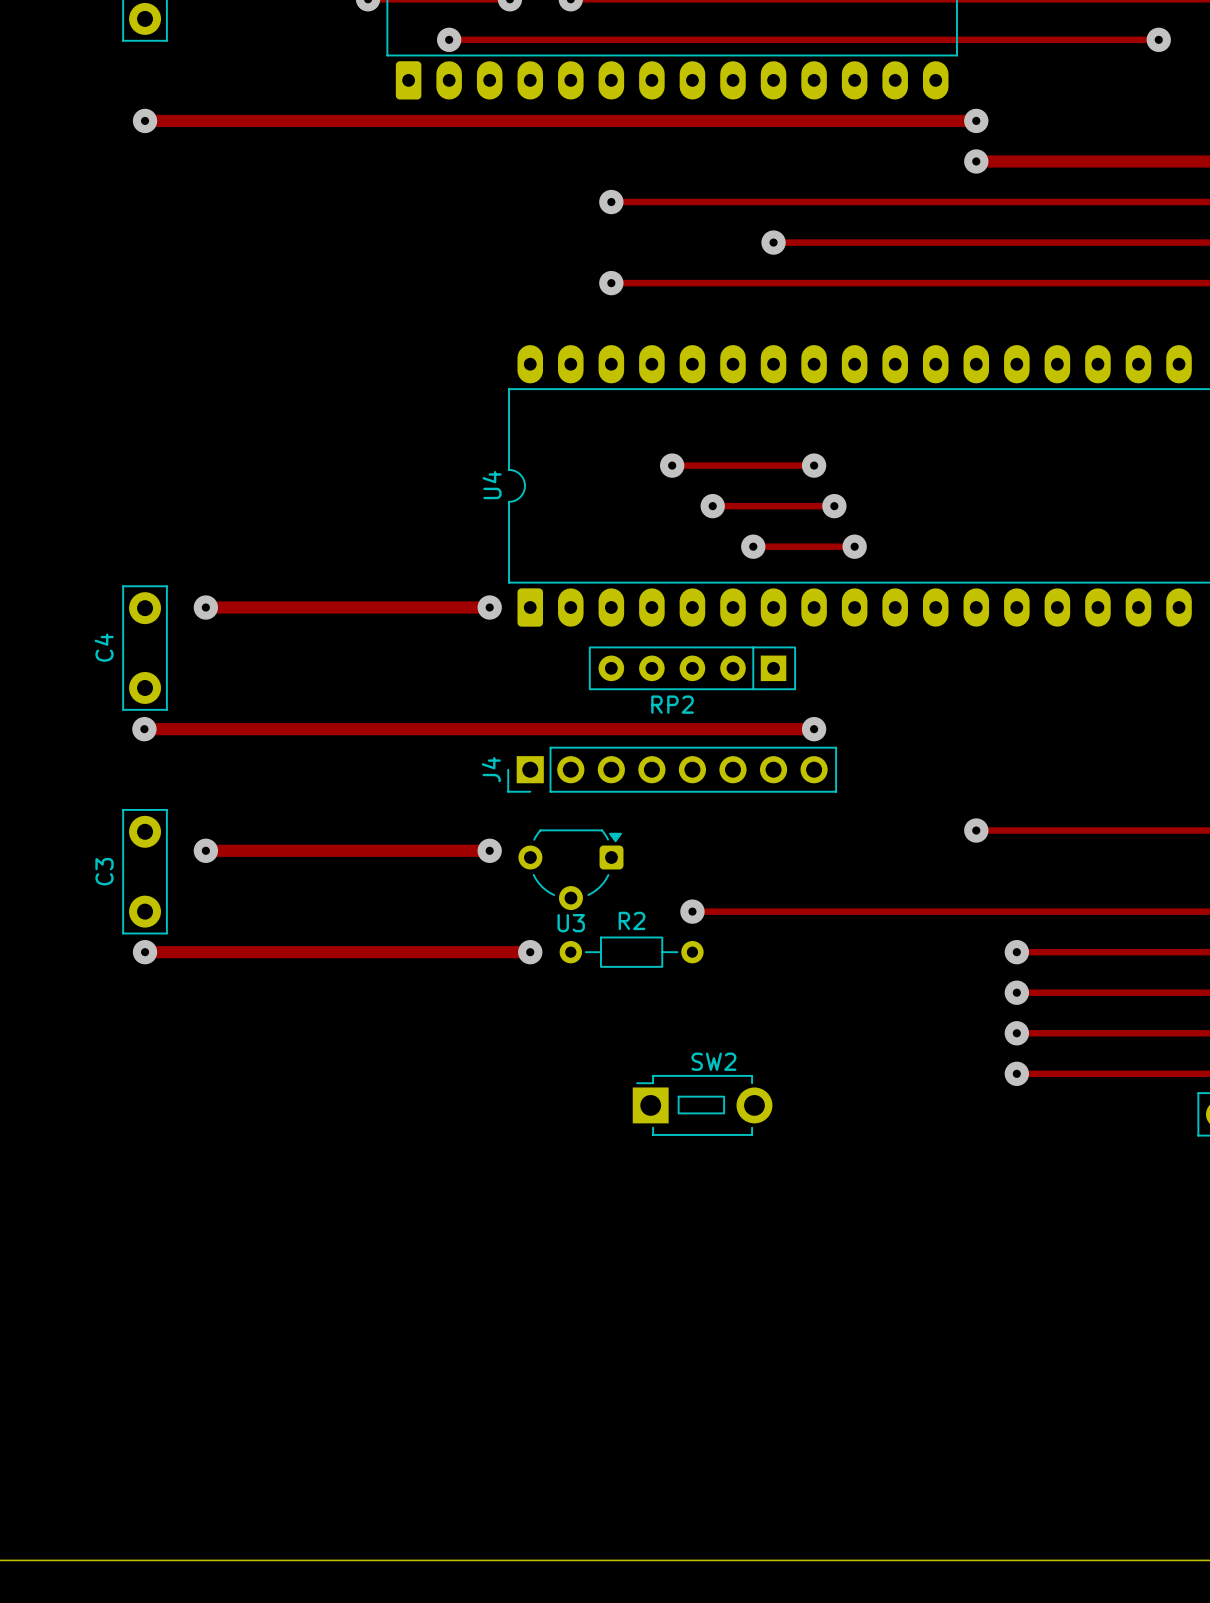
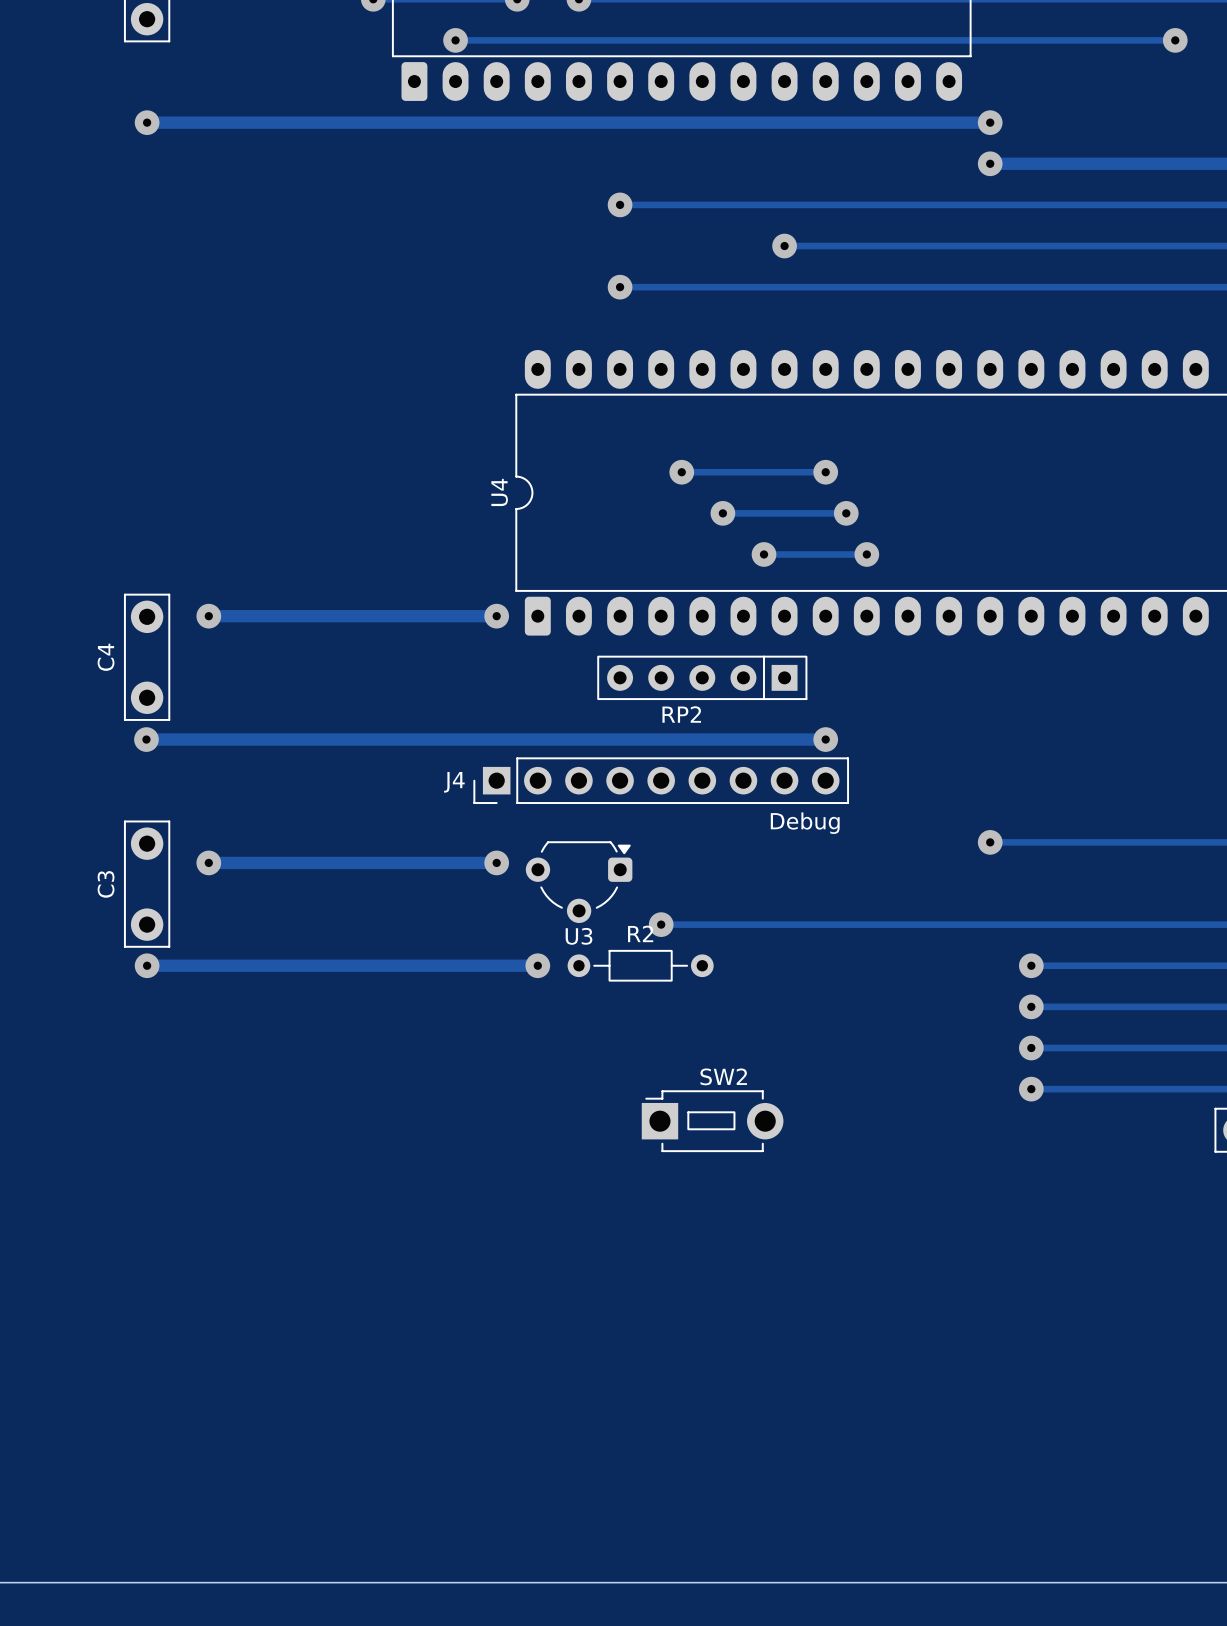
J4 footprint: [507, 746, 838, 793] -> [473, 757, 850, 804]
J4 value: none -> Debug (805, 823)
track: none -> (661, 924) (702, 924)
via position: (692, 911) -> (661, 924)

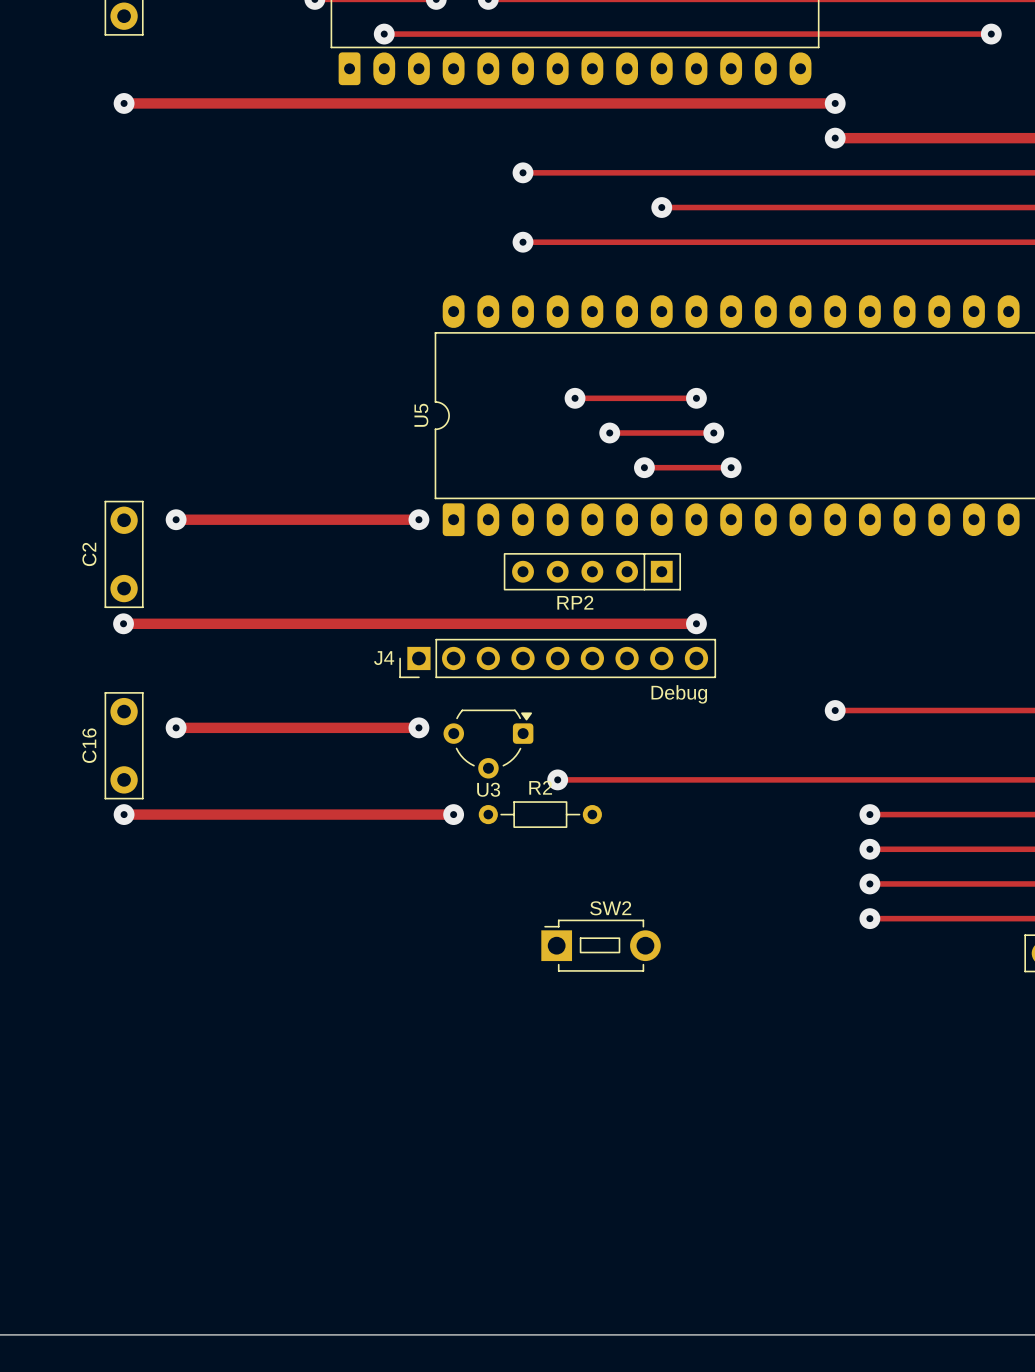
U4 name: U4 (499, 492) -> U5 (421, 415)
C4 name: C4 (106, 657) -> C2 (89, 554)
C3 name: C3 (106, 884) -> C16 (89, 745)

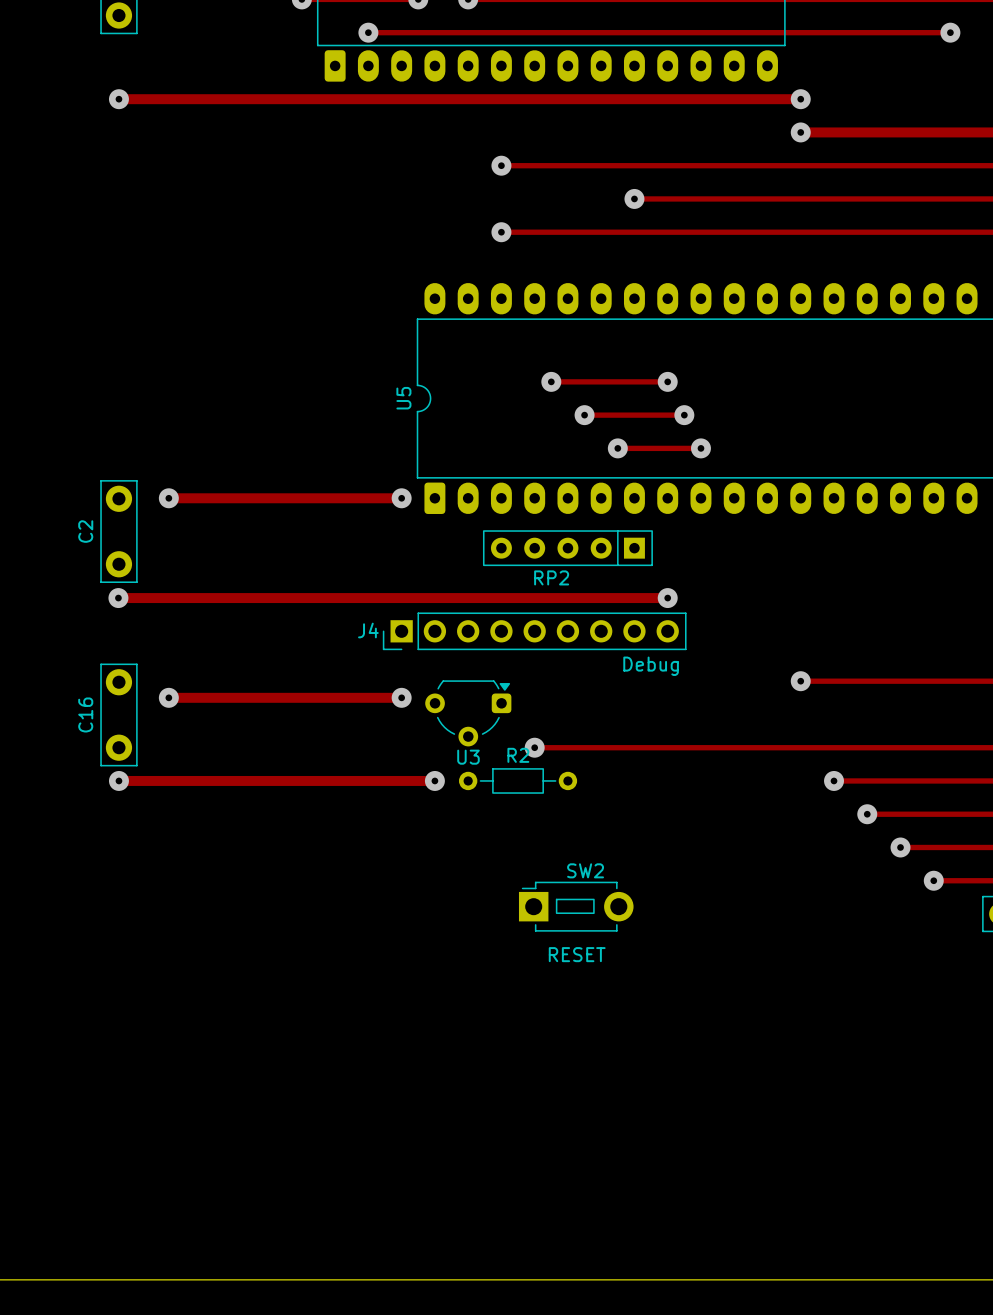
track: (869, 849) (904, 849) -> none
via: (869, 849) -> none
via: none -> (867, 814)
track: (869, 883) (939, 883) -> none
via: (869, 883) -> none
via: none -> (900, 847)
track: (869, 918) (973, 918) -> none
via: (869, 918) -> none
via: none -> (933, 880)
SW2 value: none -> RESET (577, 954)

